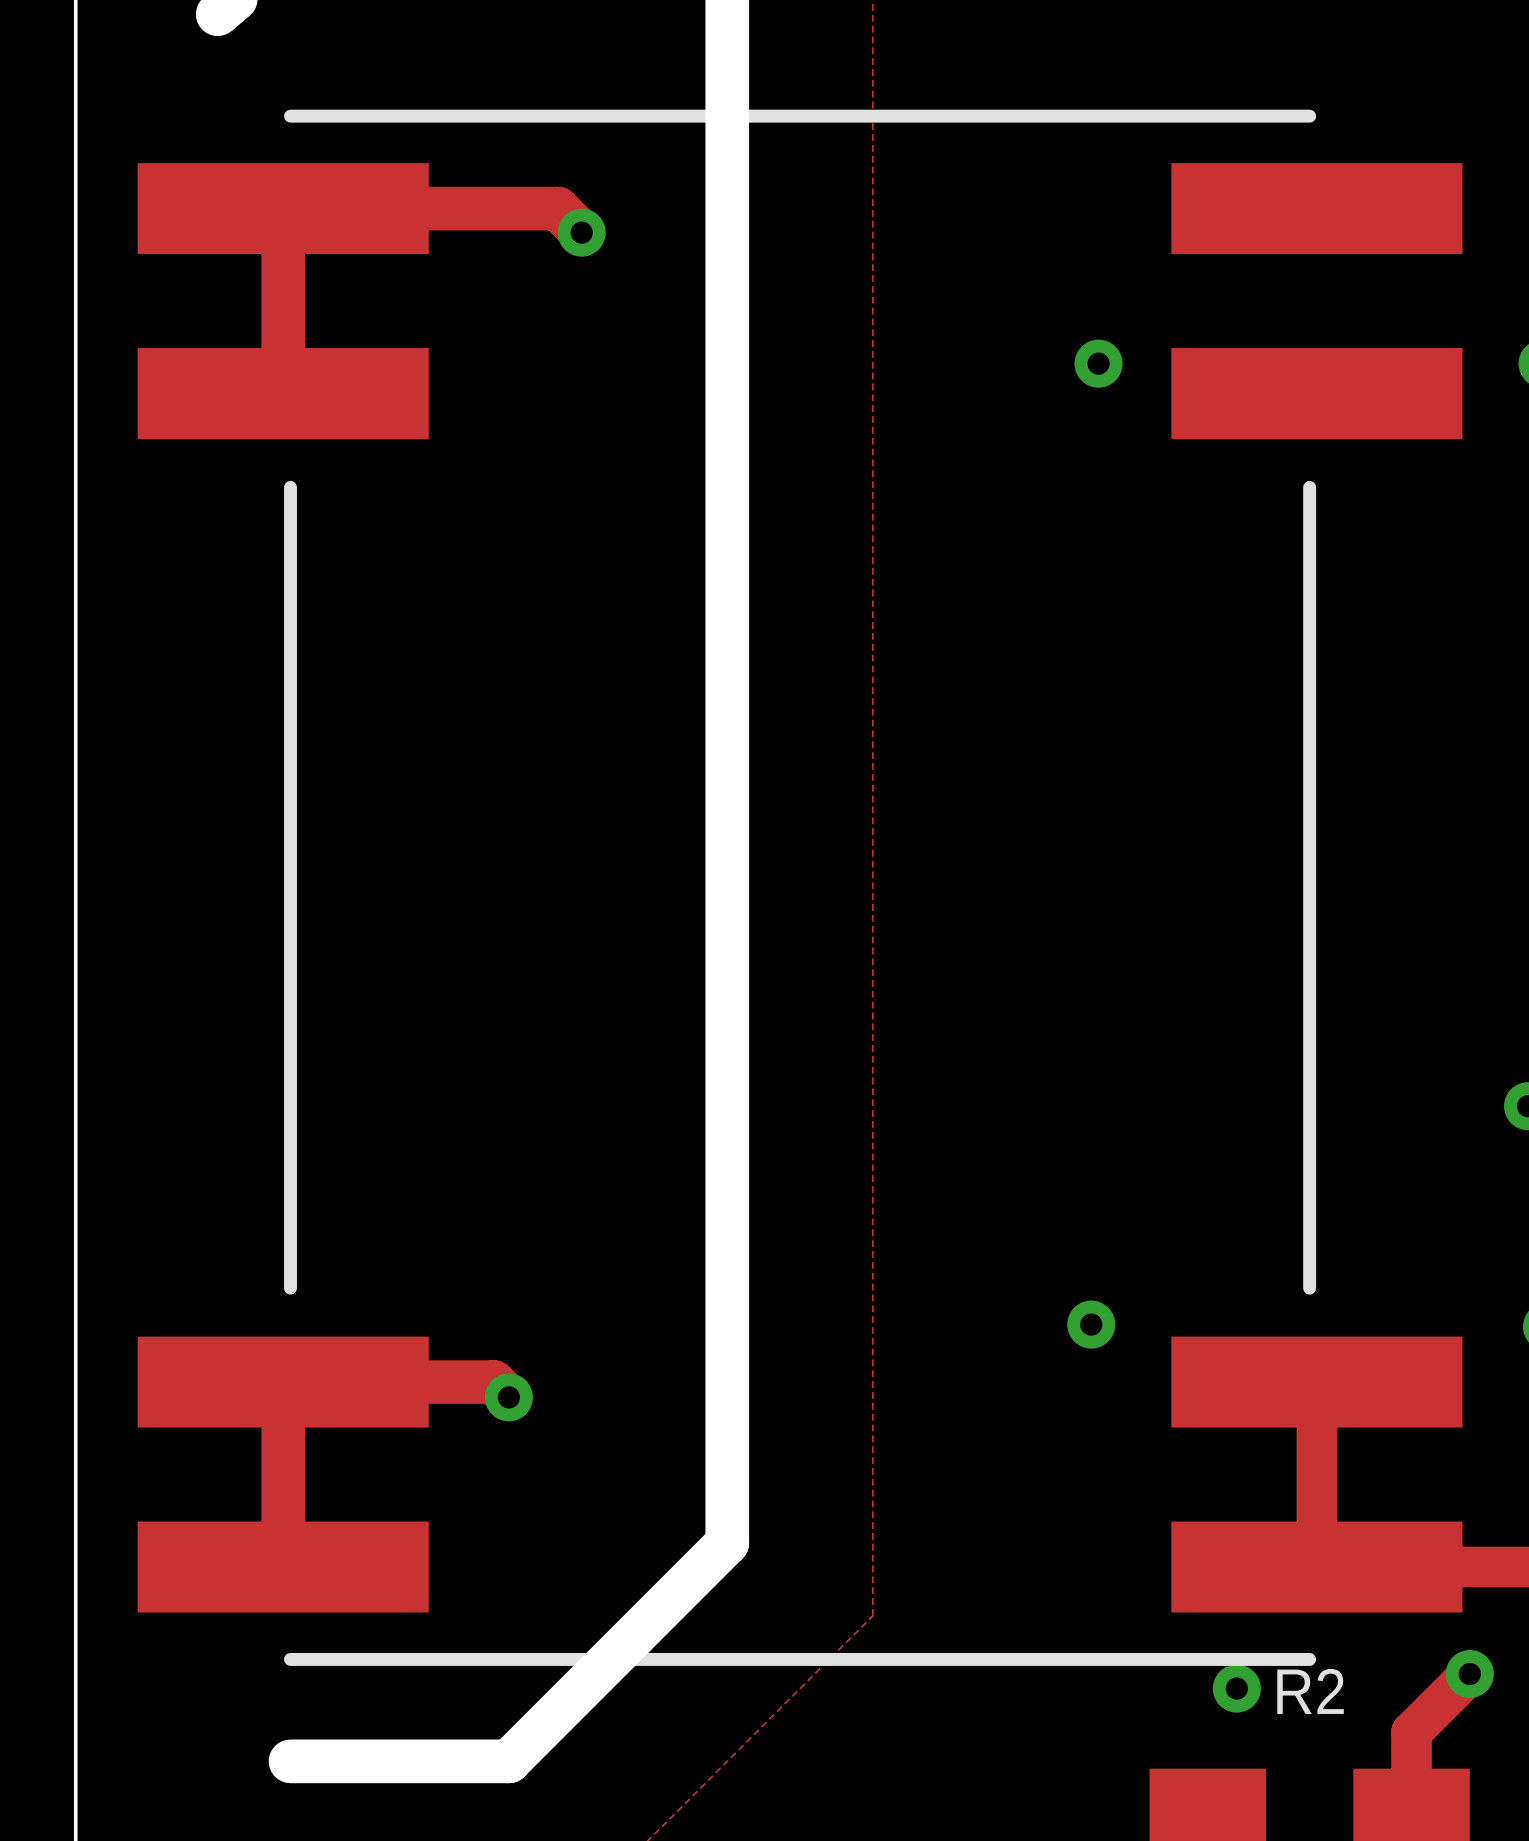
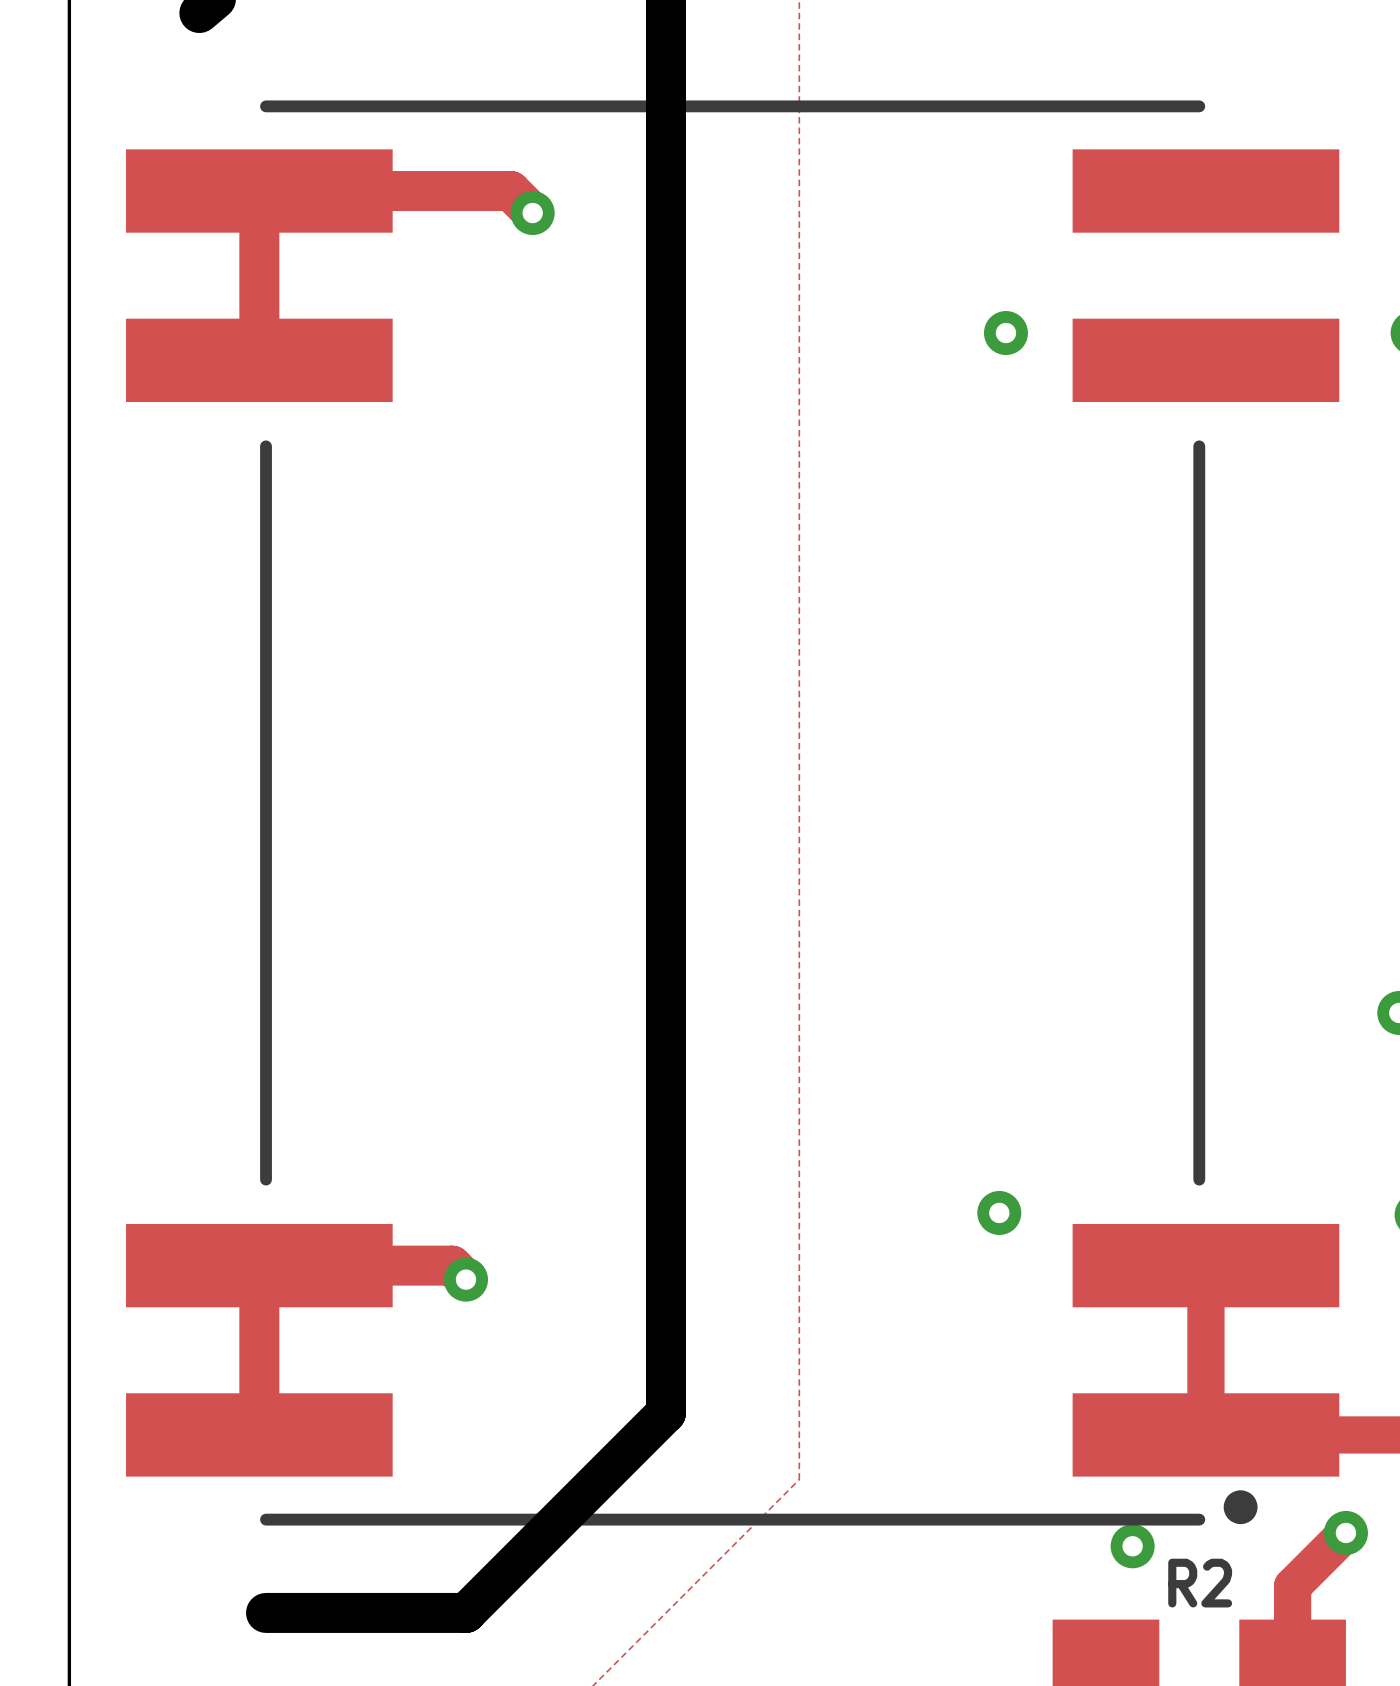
part footprint: [137, 109, 1463, 1666] -> [126, 100, 1340, 1526]
R2 name position: R2 (1310, 1691) -> R2 (1200, 1583)

